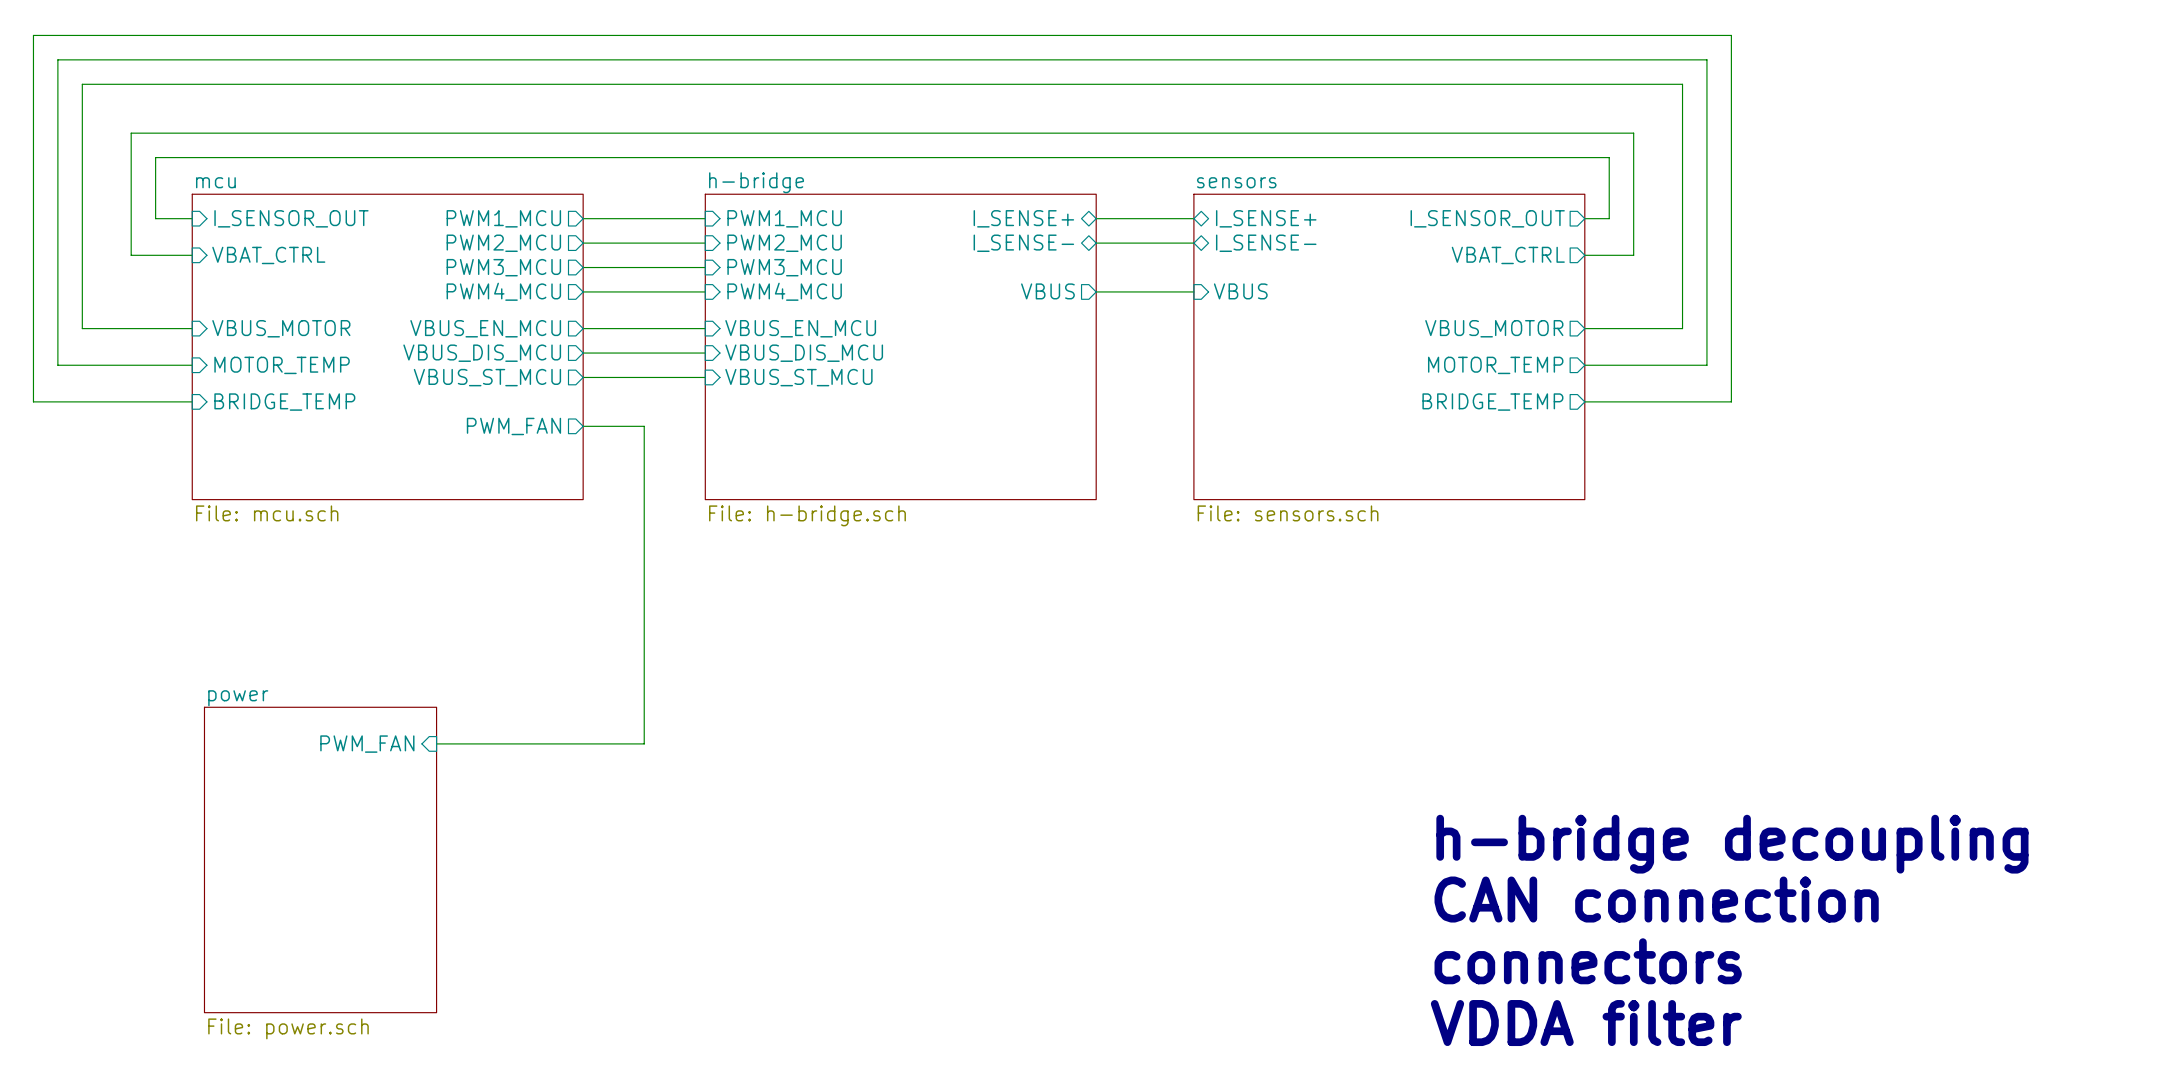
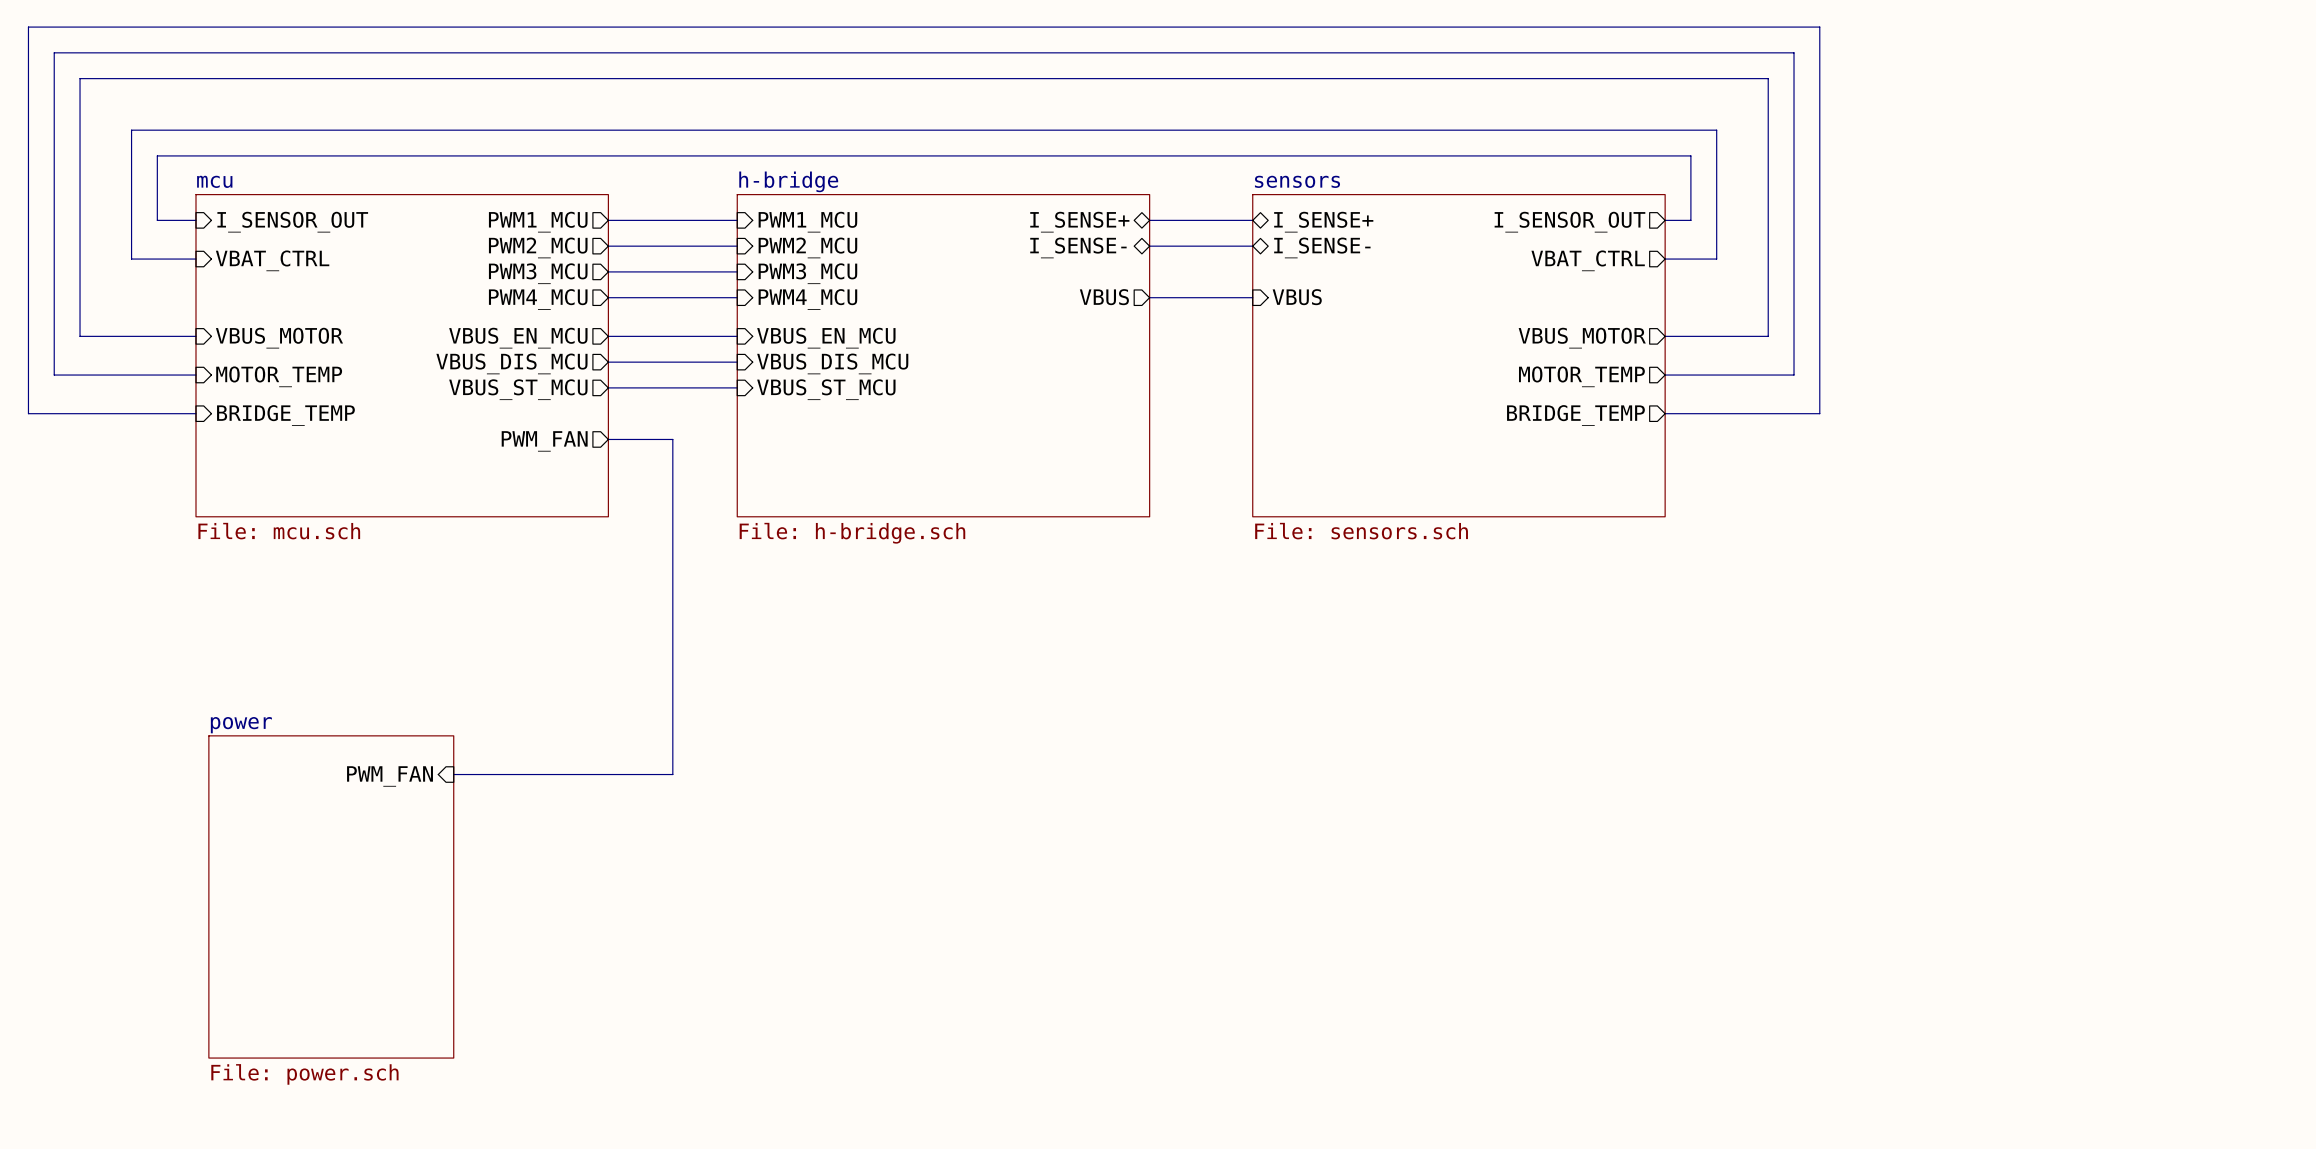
text: h-bridge decoupling (1732, 844) -> none
text: CAN connection (1656, 899) -> none
text: connectors (1588, 961) -> none
text: VDDA filter (1586, 1023) -> none

